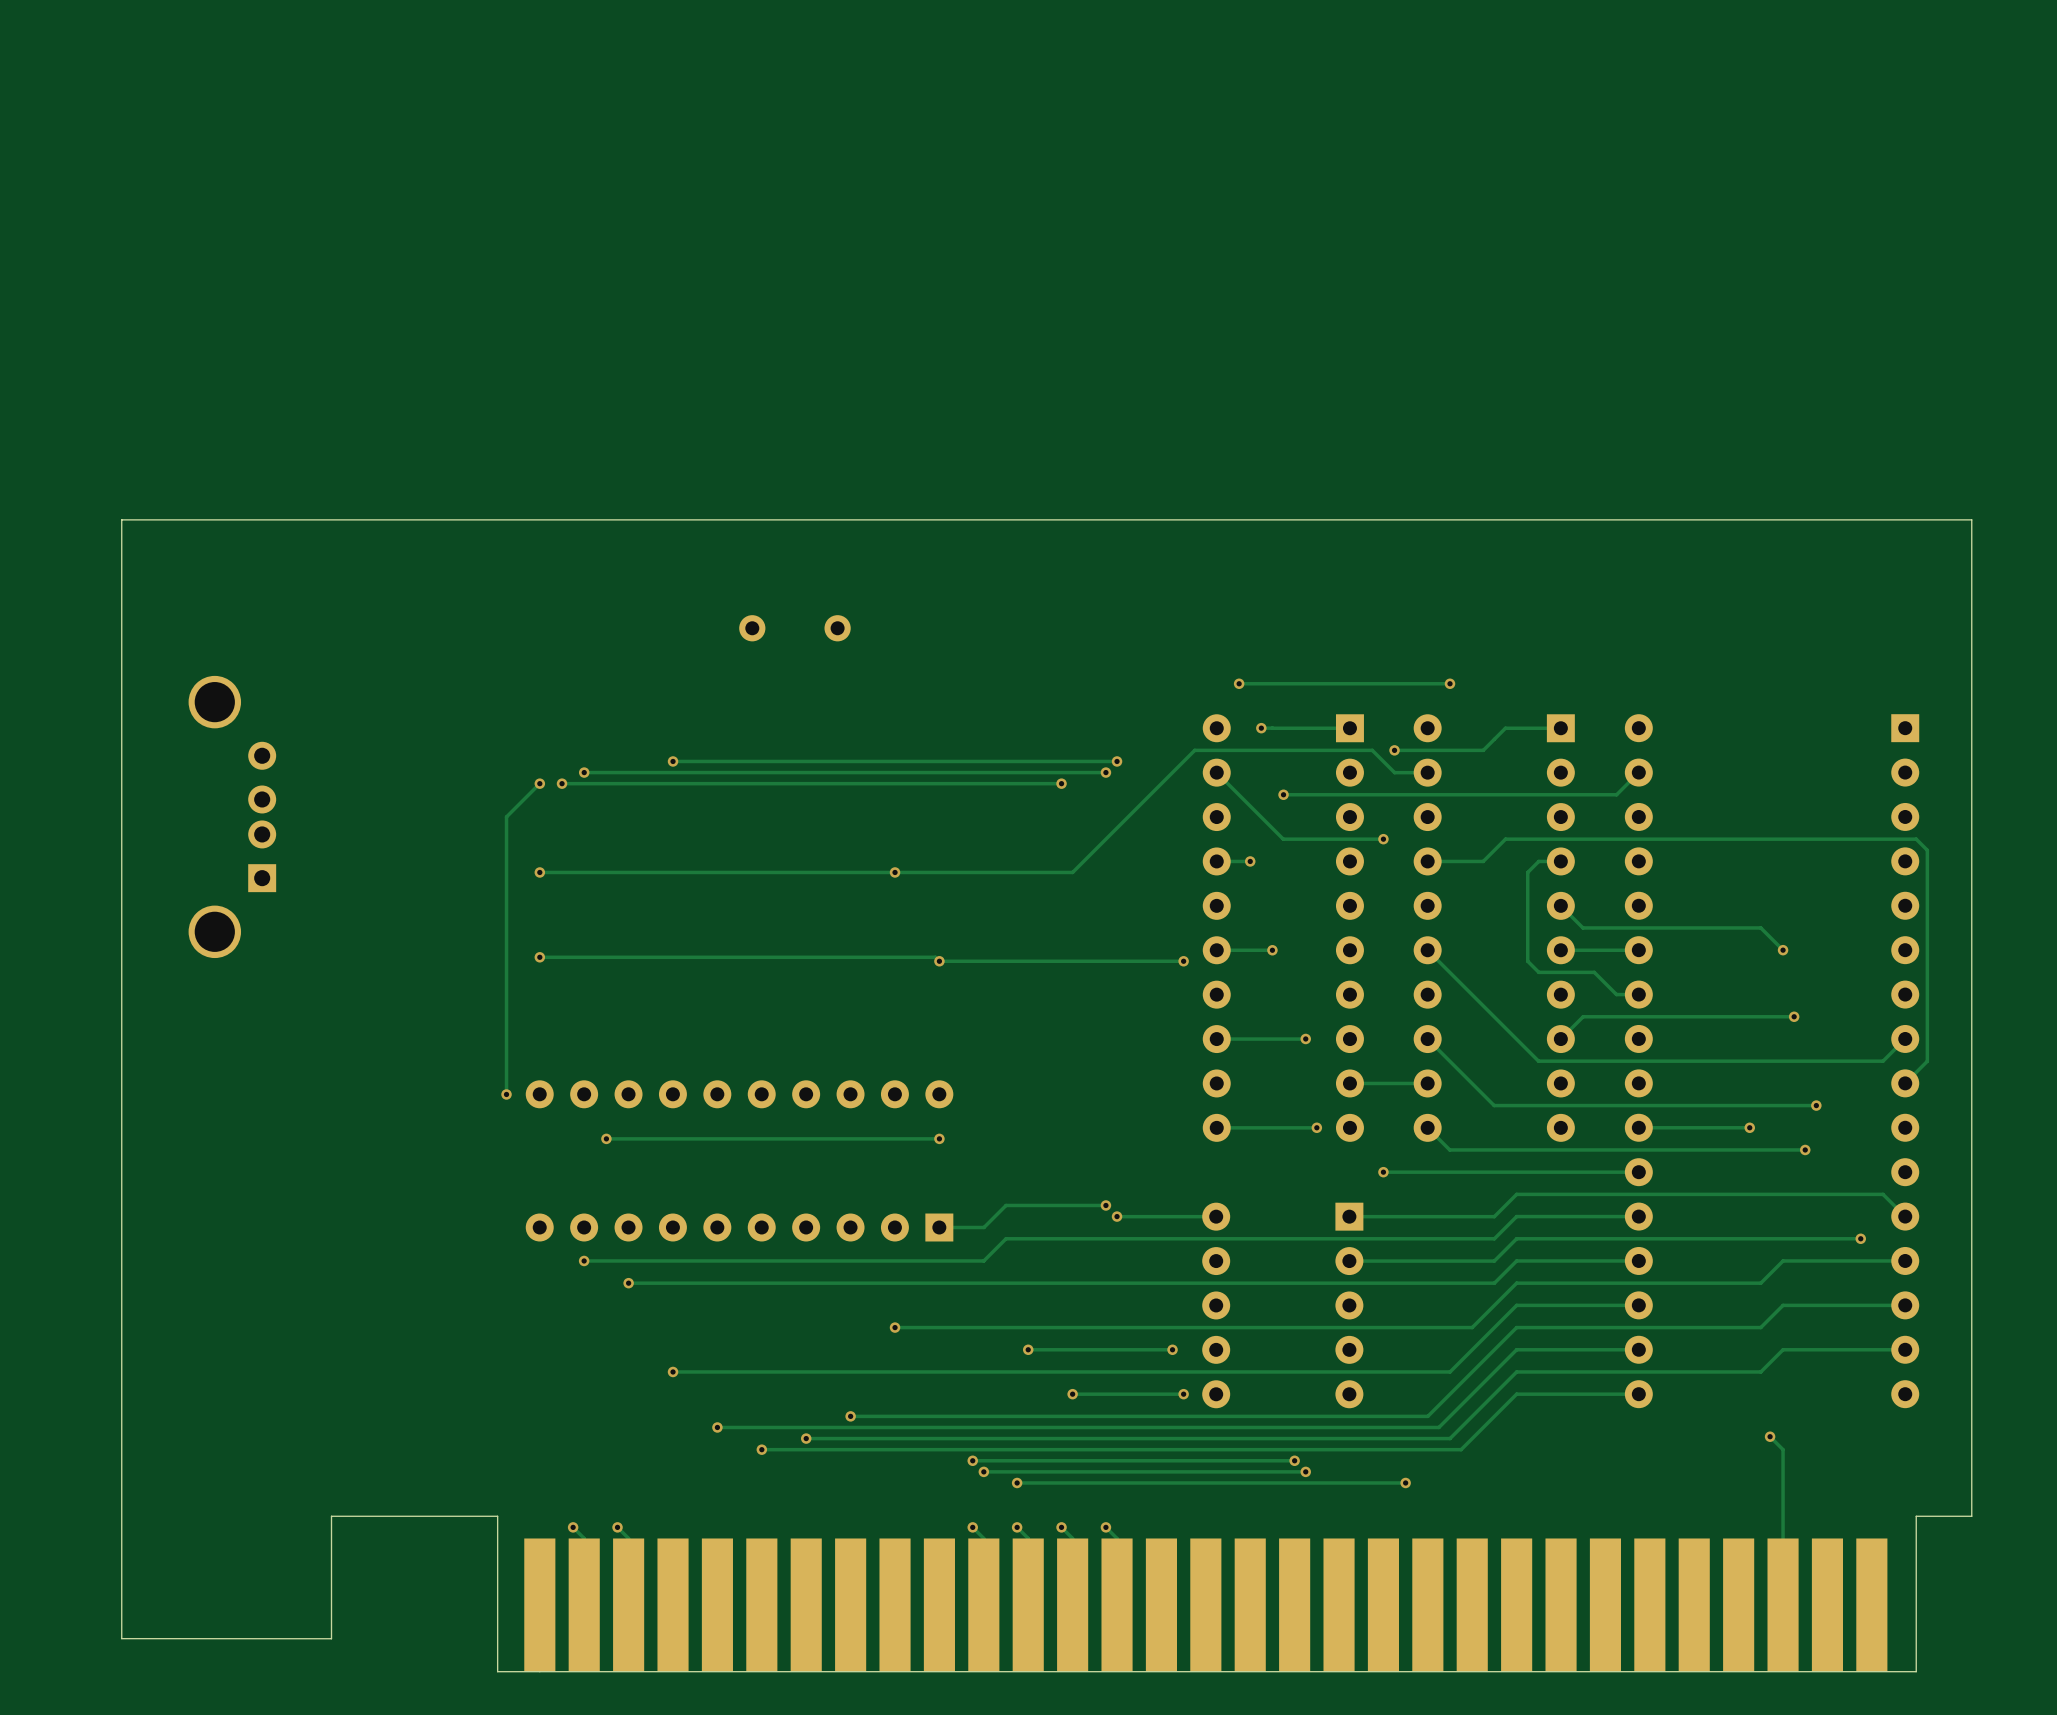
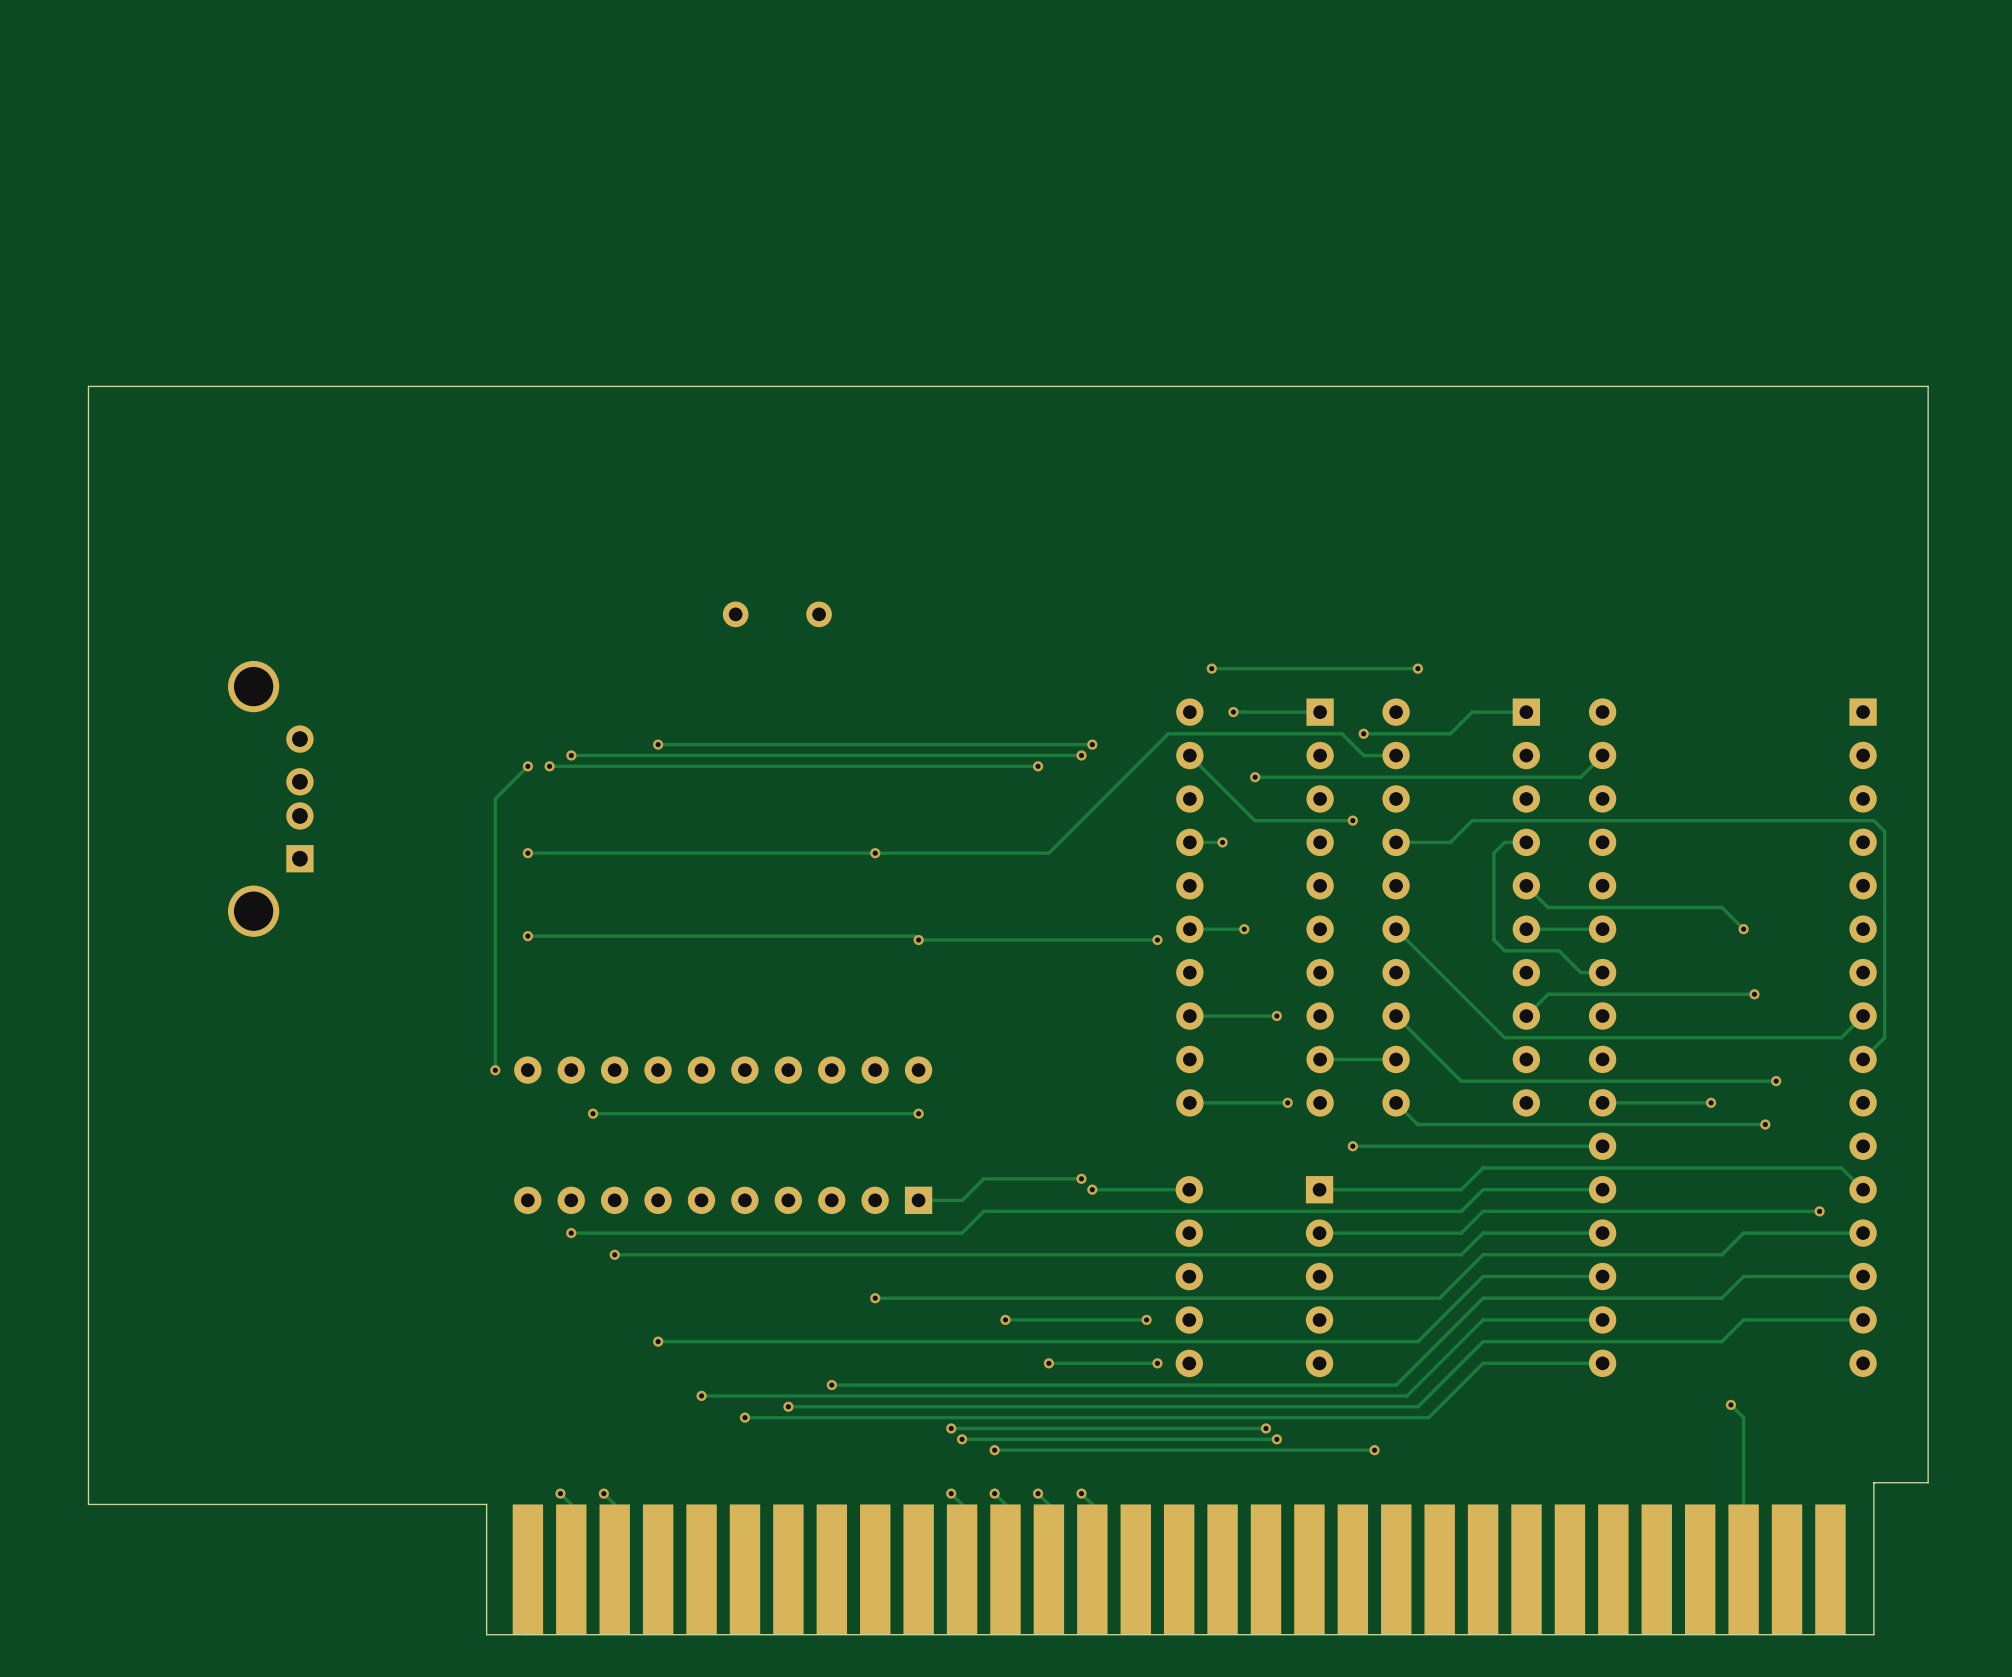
board edge: (1971, 519) (121, 519) (121, 1638) (331, 1638) (331, 1516) (497, 1516) (497, 1538) -> (1928, 508) (1928, 386) (88, 386) (88, 1504) (486, 1504)
part position: (232, 816) -> (270, 798)

